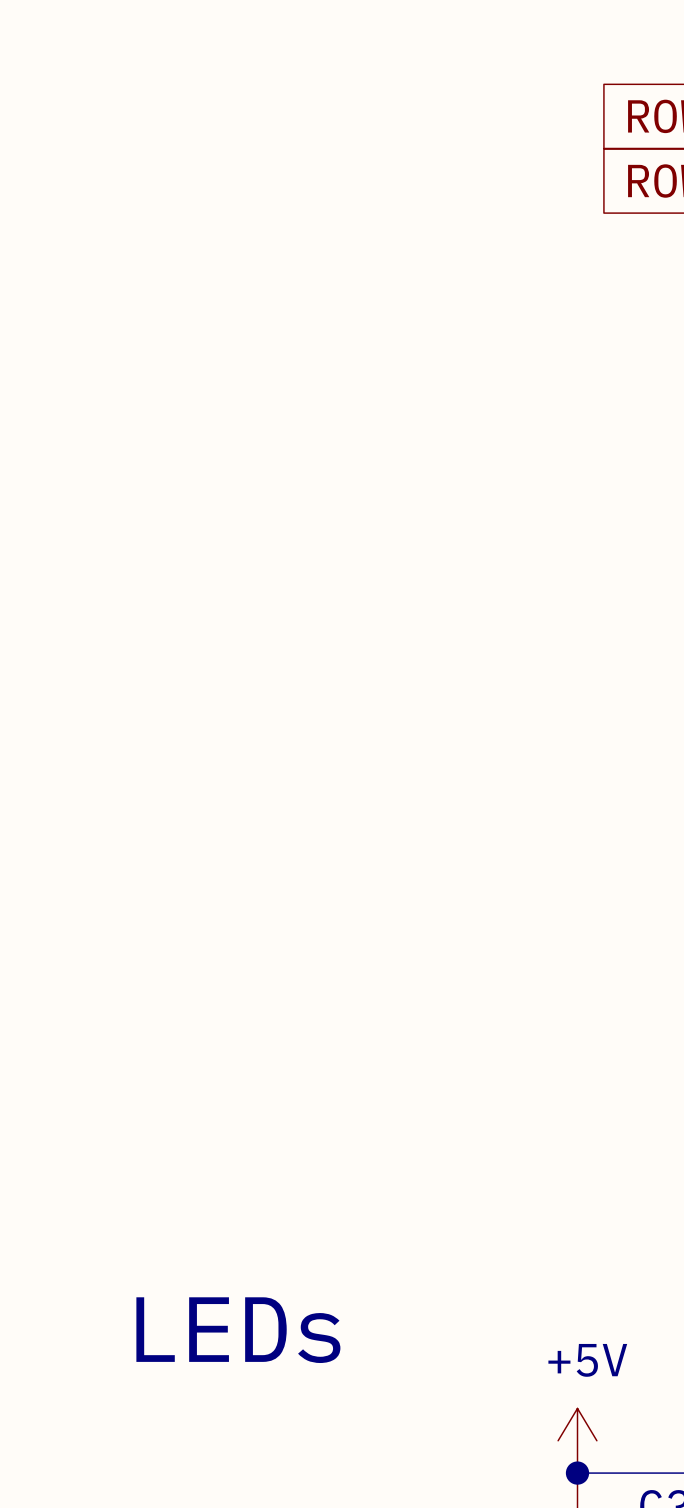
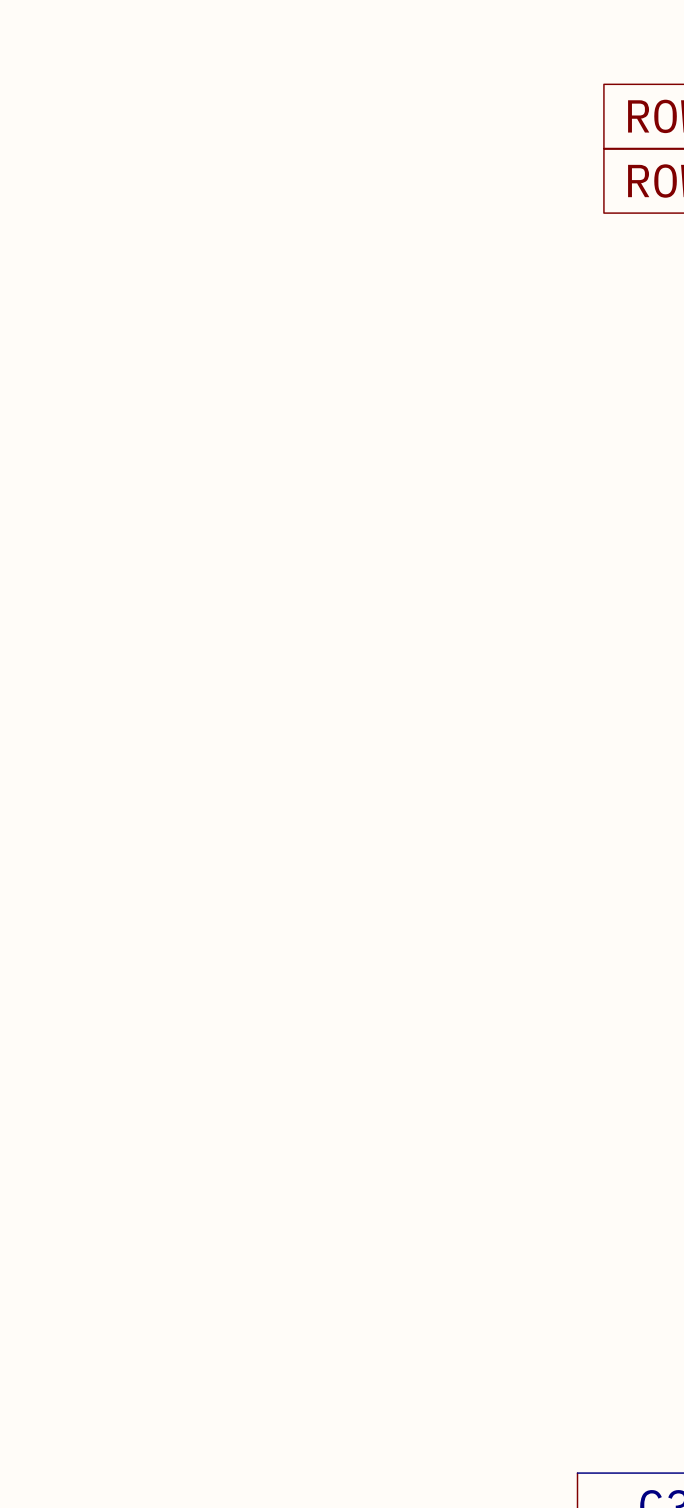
text: LEDs (238, 1330) -> none
power symbol: +5V (577, 1440) -> none
junction: (577, 1473) -> none

